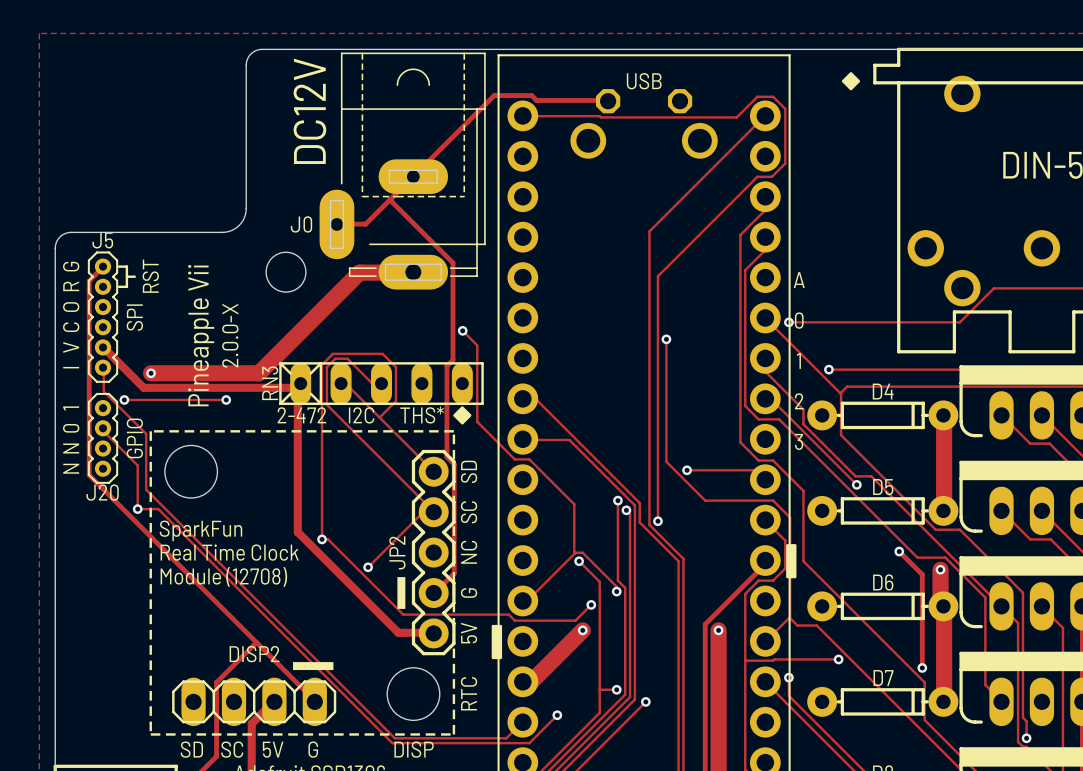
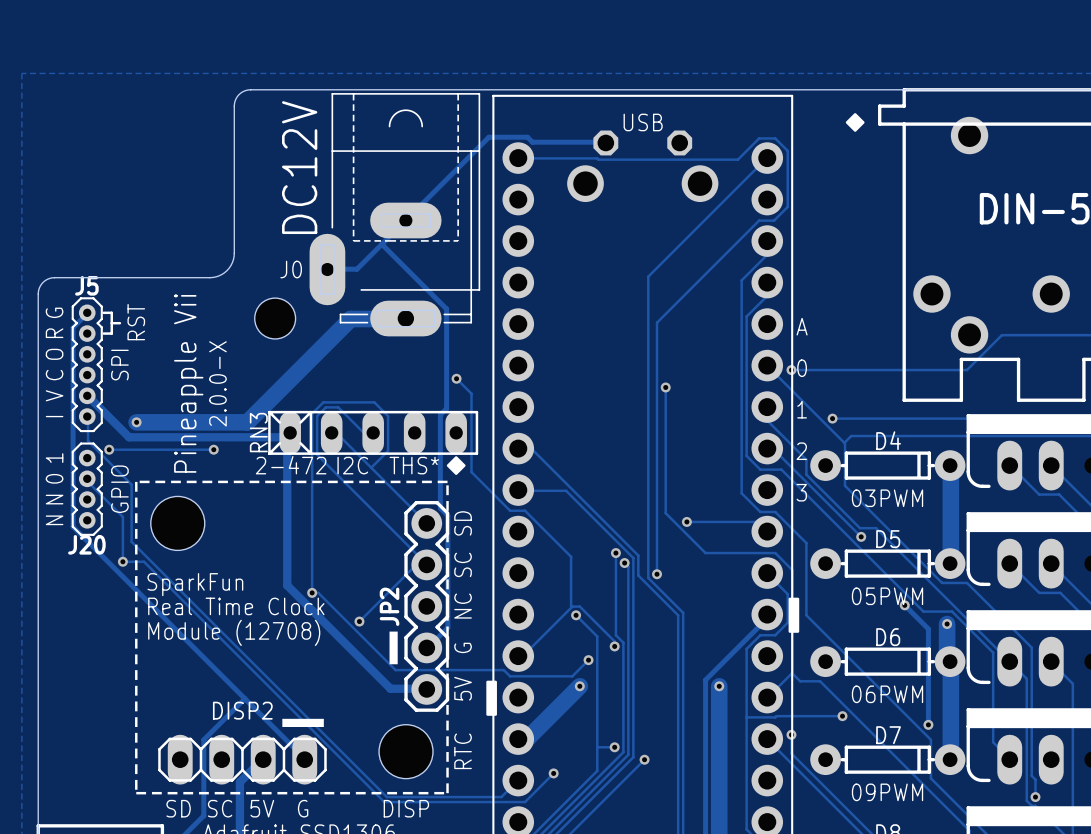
text: none -> 03PWM (887, 498)
text: none -> 05PWM (887, 596)
text: none -> 06PWM (887, 694)
text: none -> 09PWM (887, 792)

